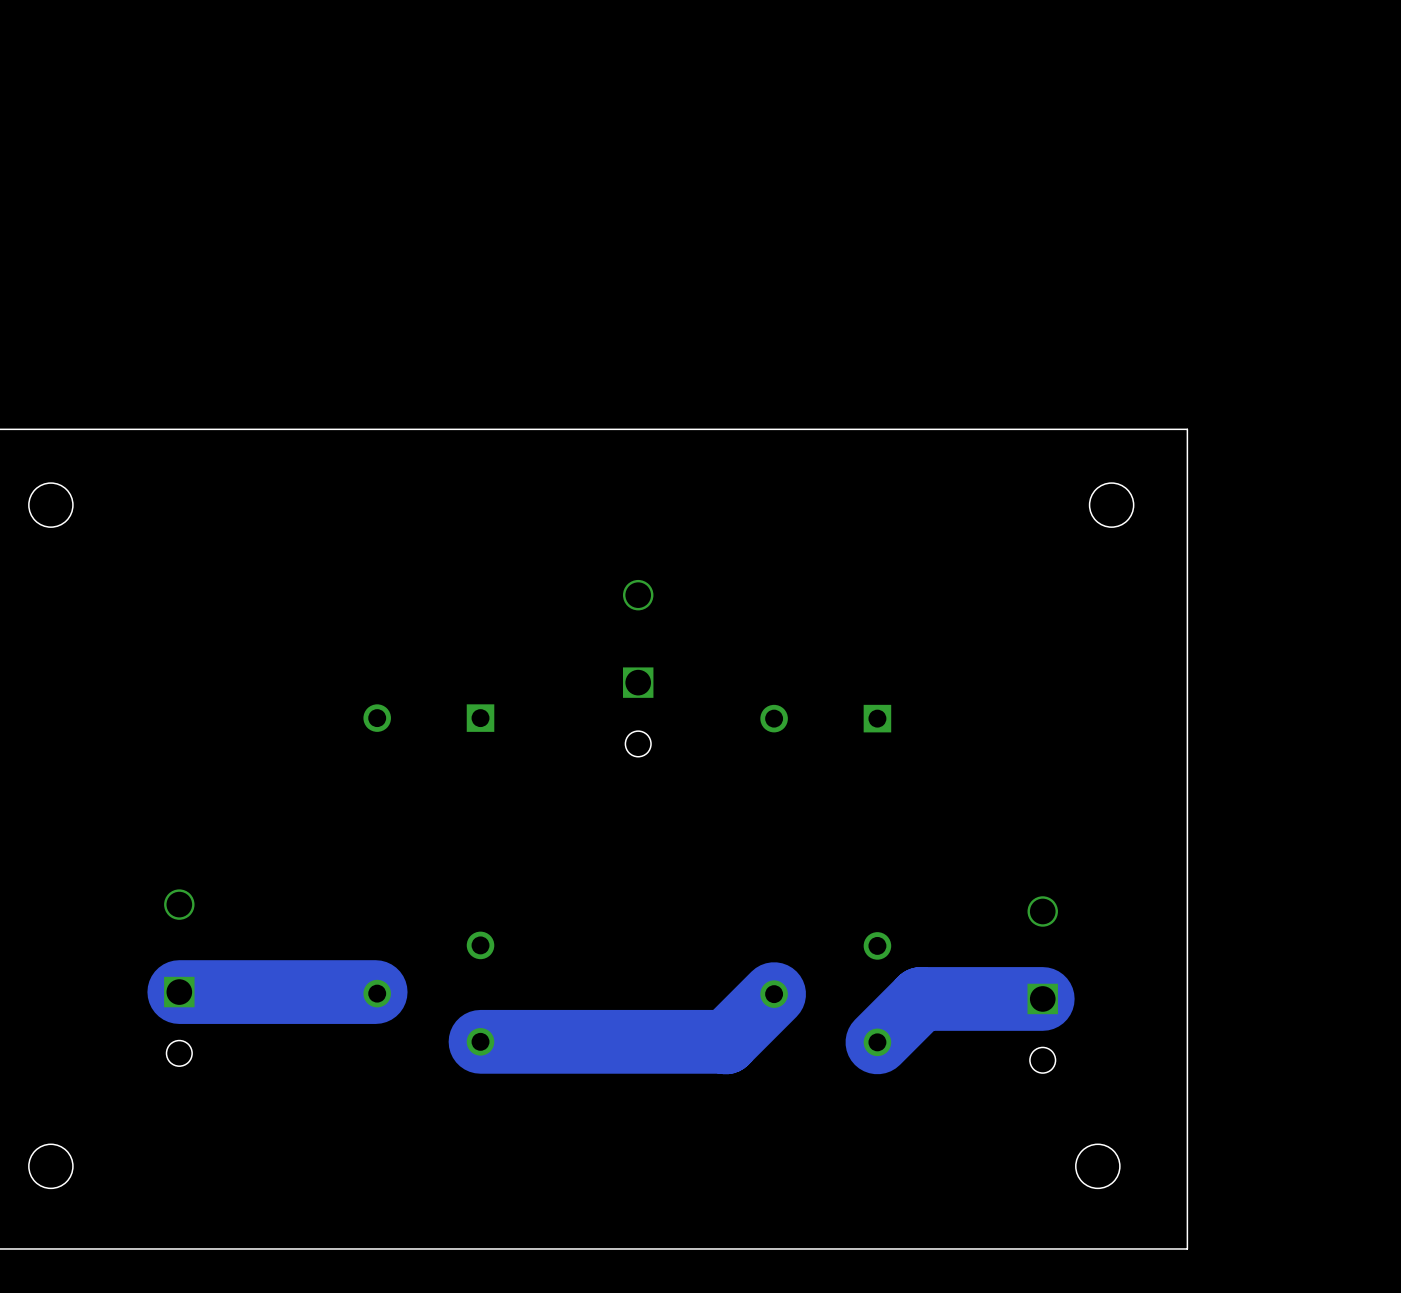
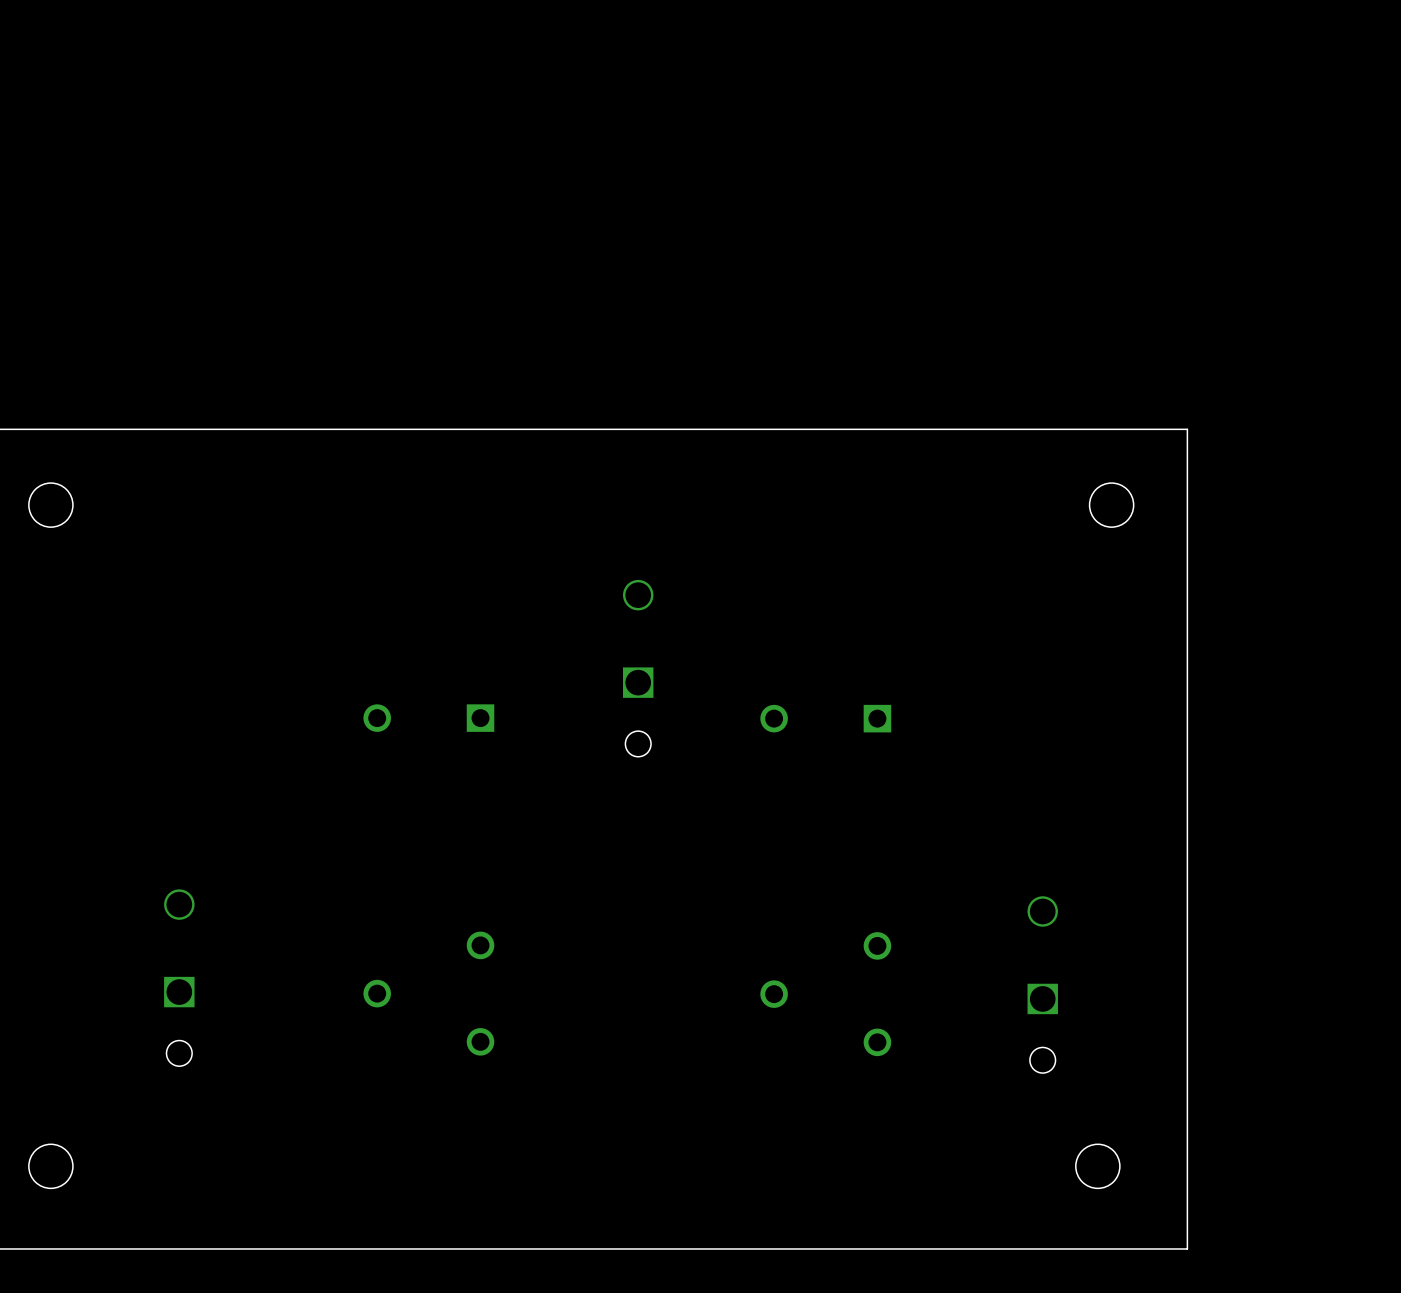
track: (179, 992) (375, 992) (377, 993) -> none
track: (774, 994) (725, 1042) (480, 1041) -> none
track: (1042, 998) (920, 998) (877, 1042) -> none

